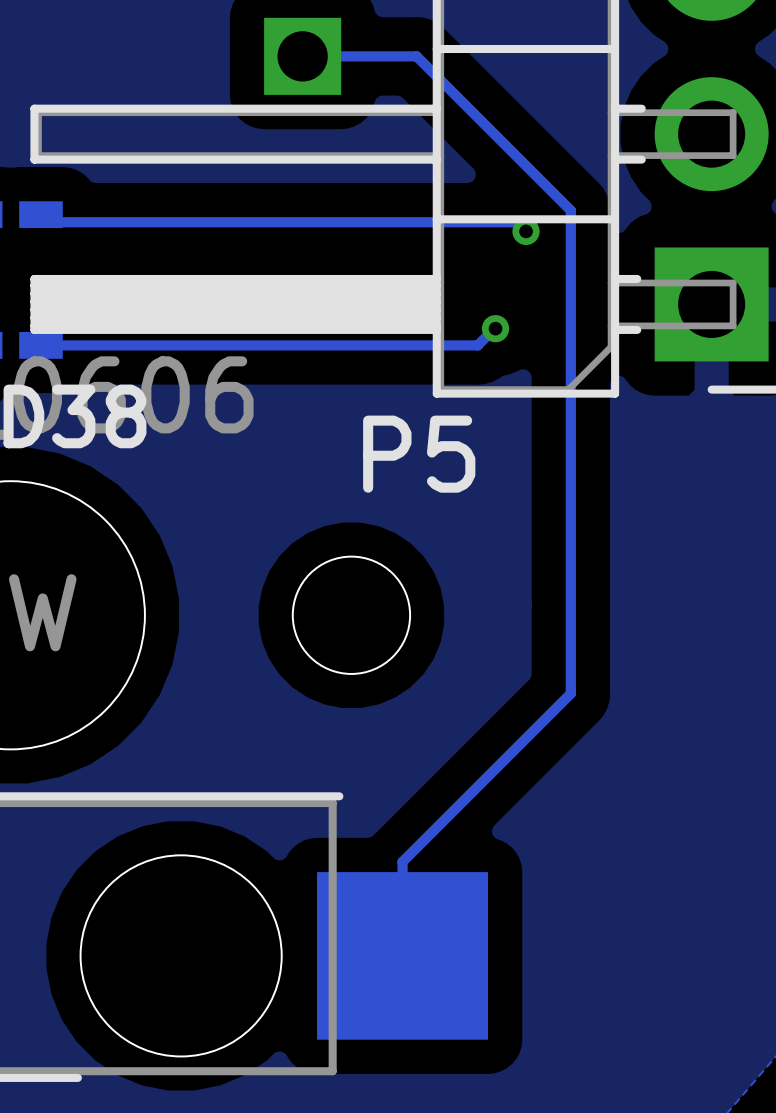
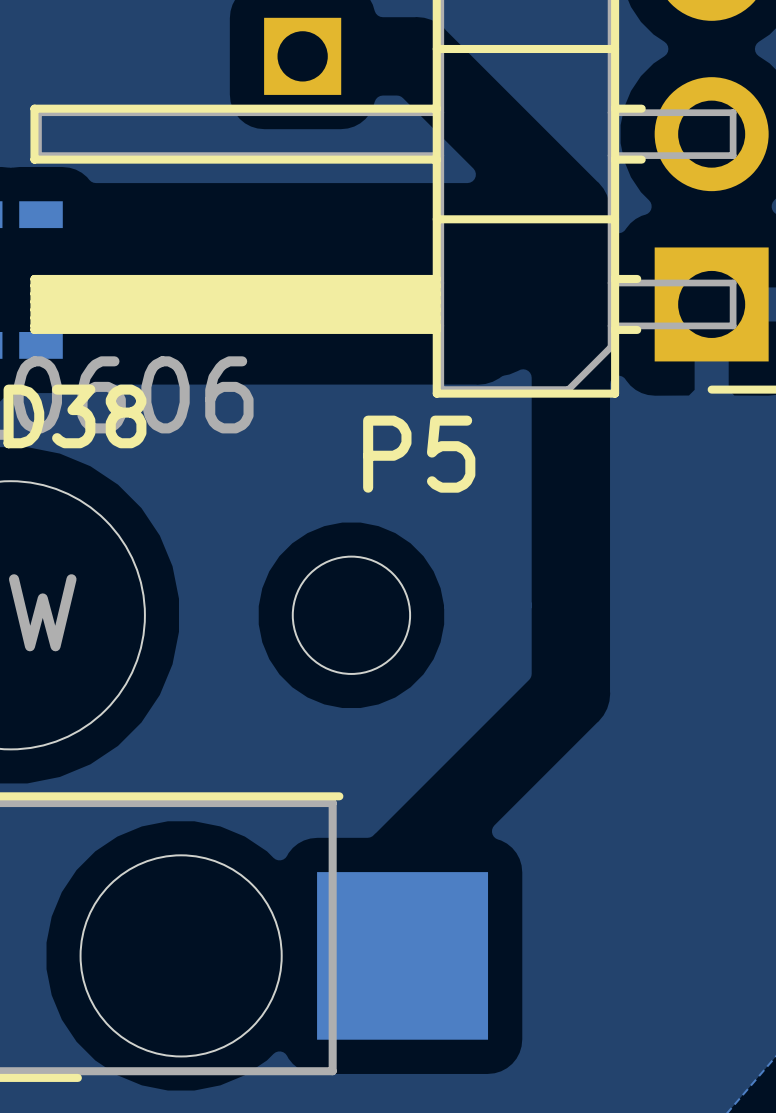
track: (302, 56) (416, 56) (570, 210) (570, 693) (402, 861) (402, 955) (457, 1010) -> none
track: (38, 222) (516, 222) (526, 231) -> none
via: (526, 231) -> none
track: (494, 328) (477, 345) (41, 345) -> none
via: (495, 328) -> none

